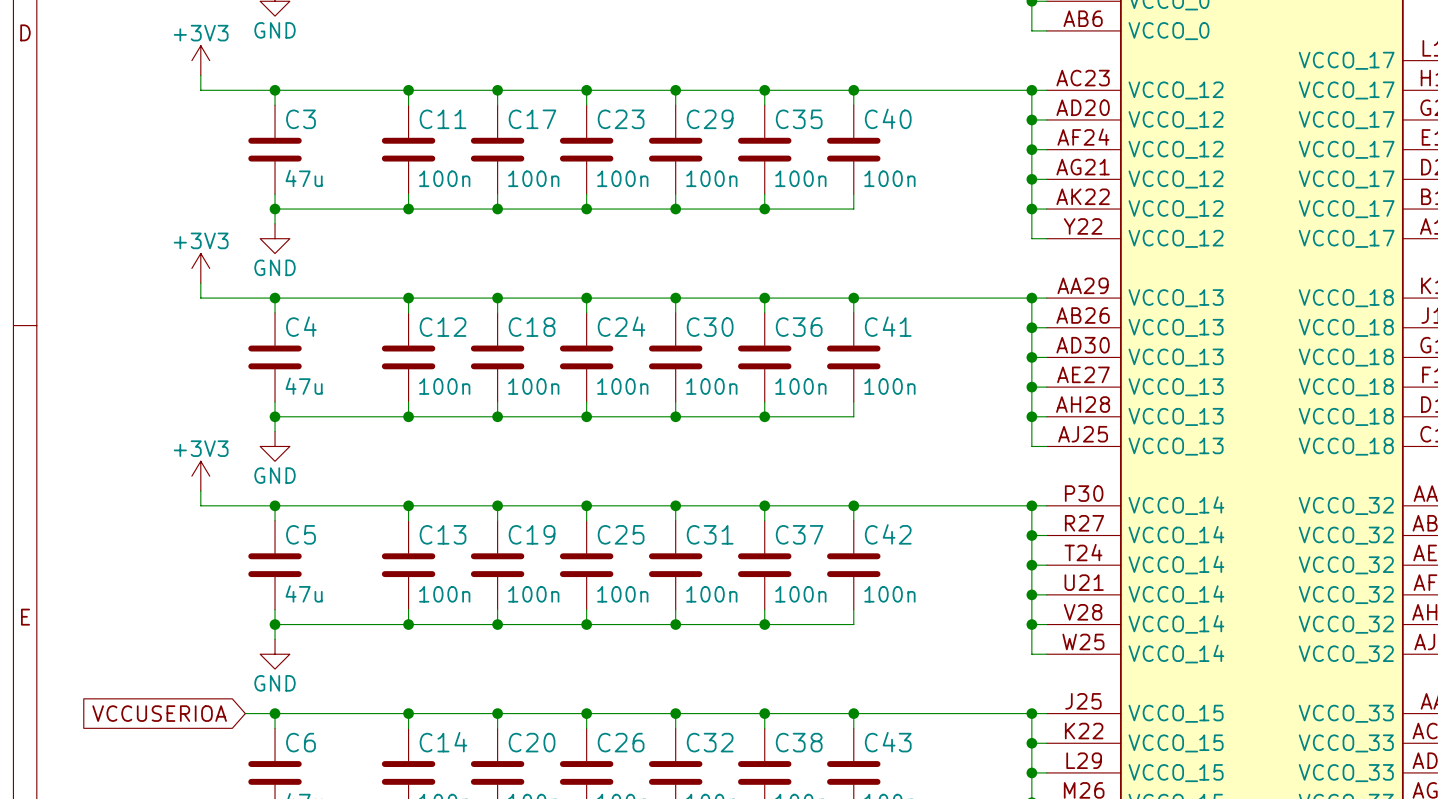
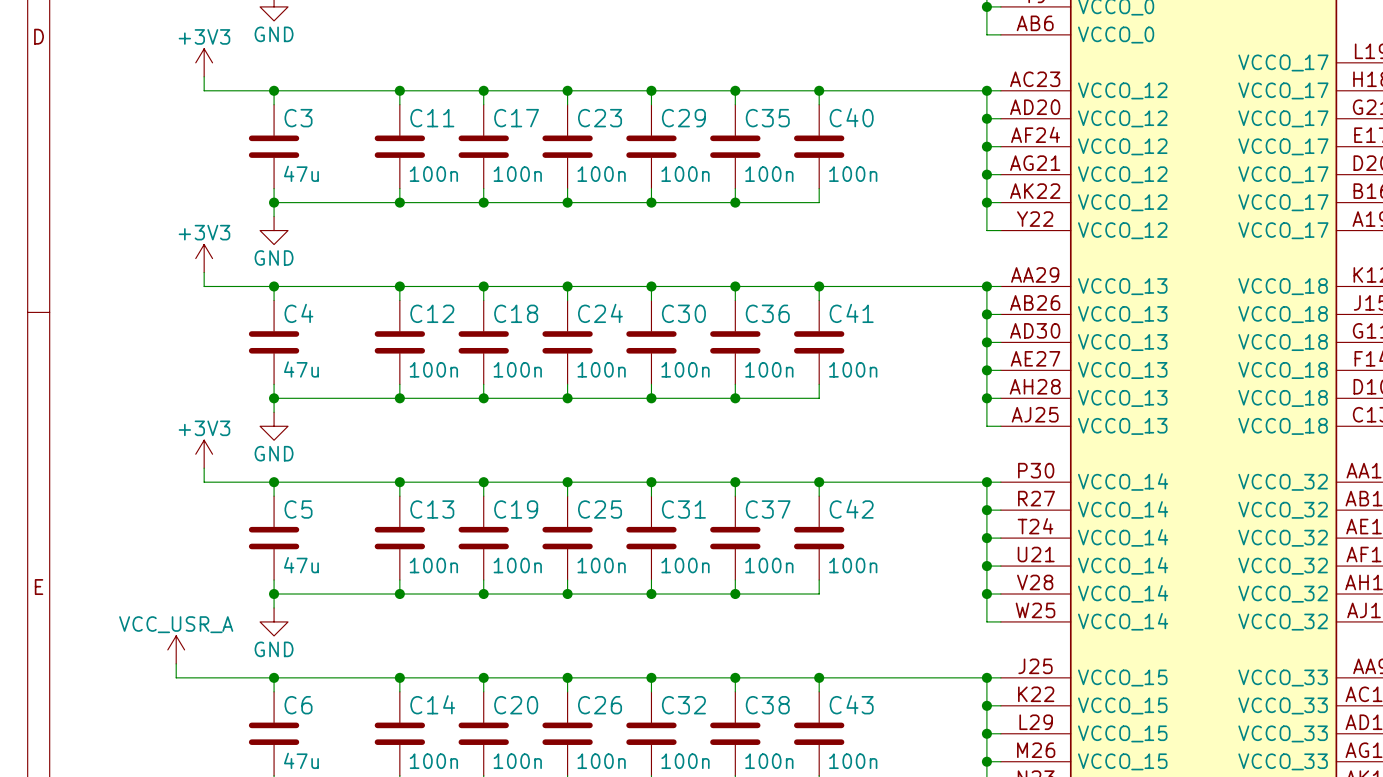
power symbol: none -> VCC_USR_A (176, 649)
wire: none -> (176, 663) (176, 677) (246, 677)
global label: VCCUSERIOA (159, 713) -> none

